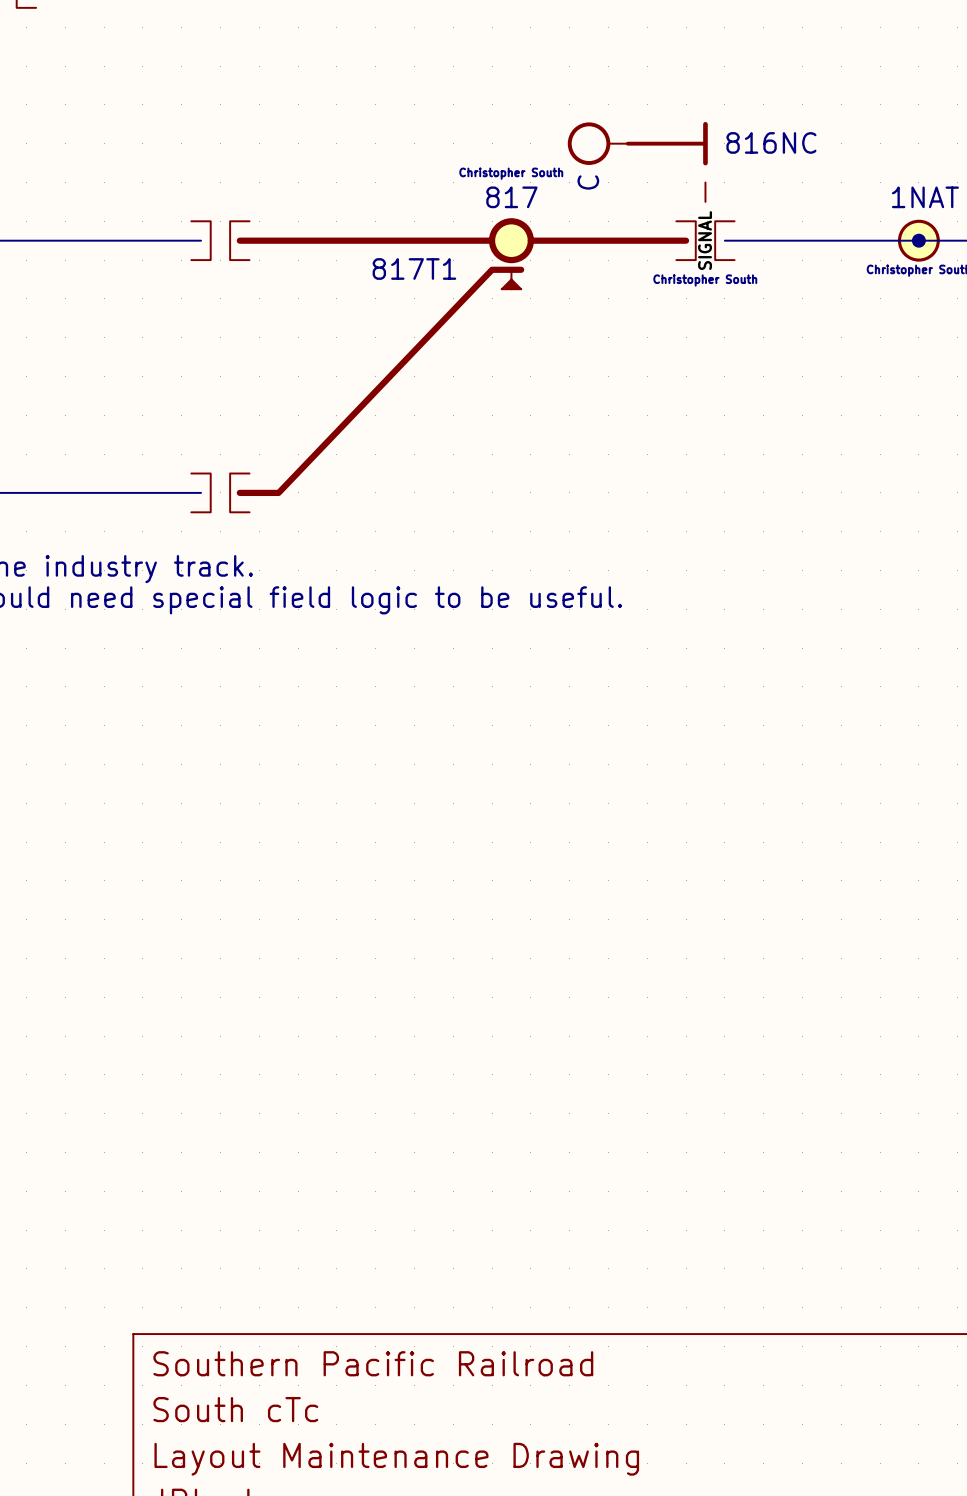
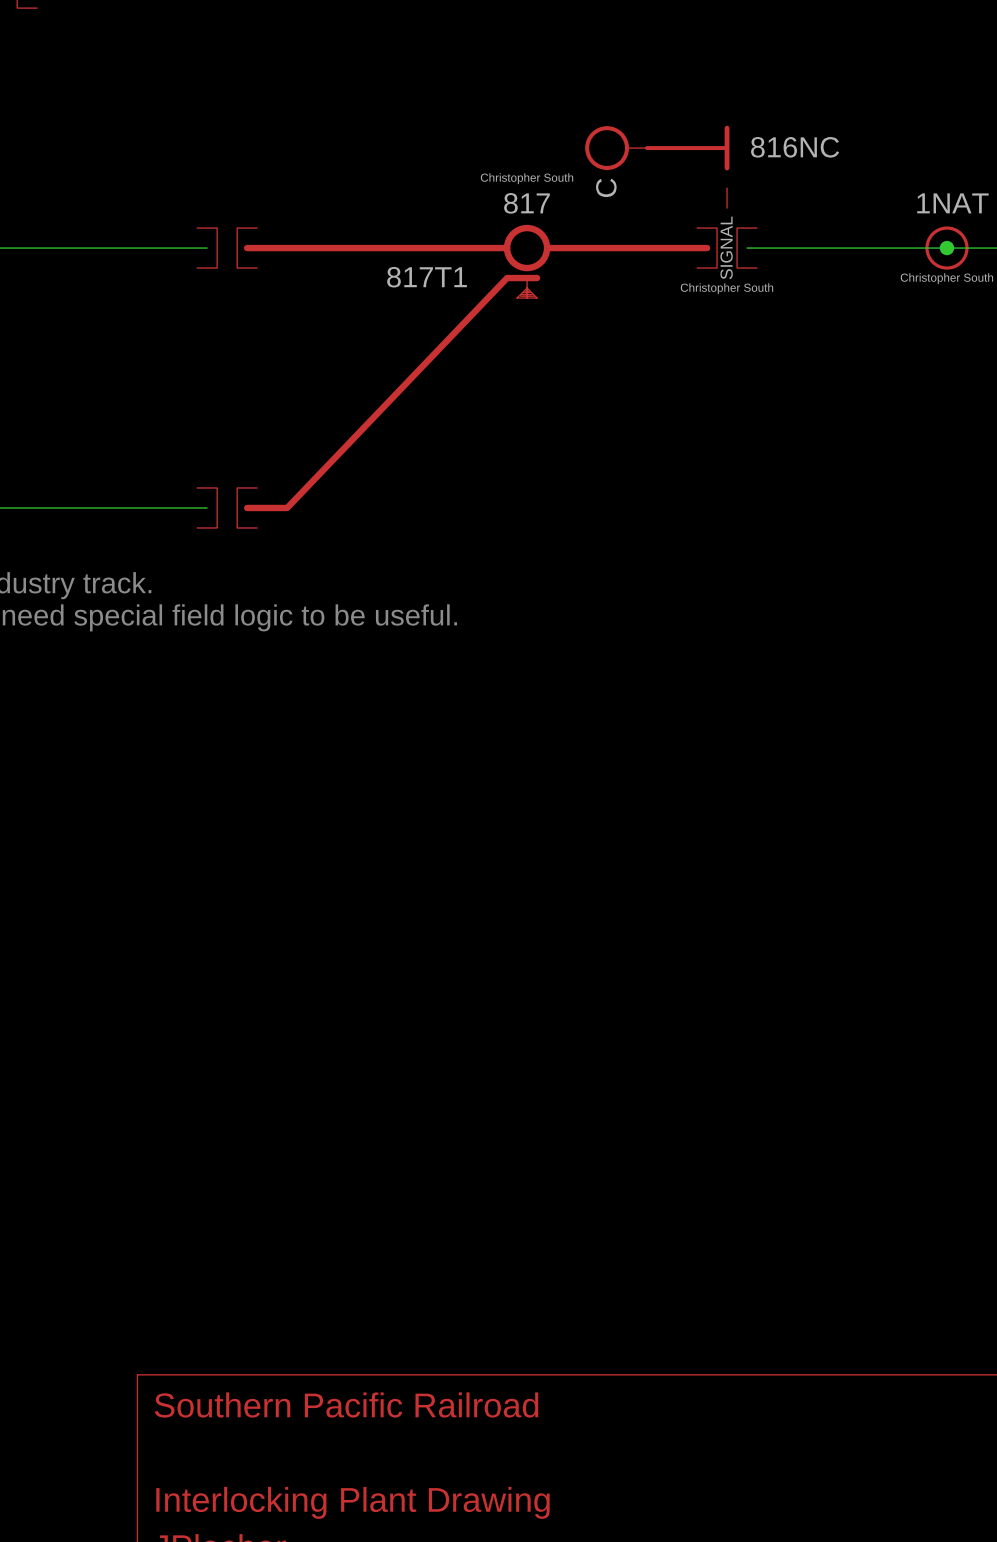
title block: South cTc (235, 1409) -> none
title block: Layout Maintenance Drawing (396, 1459) -> Interlocking Plant Drawing (353, 1502)

